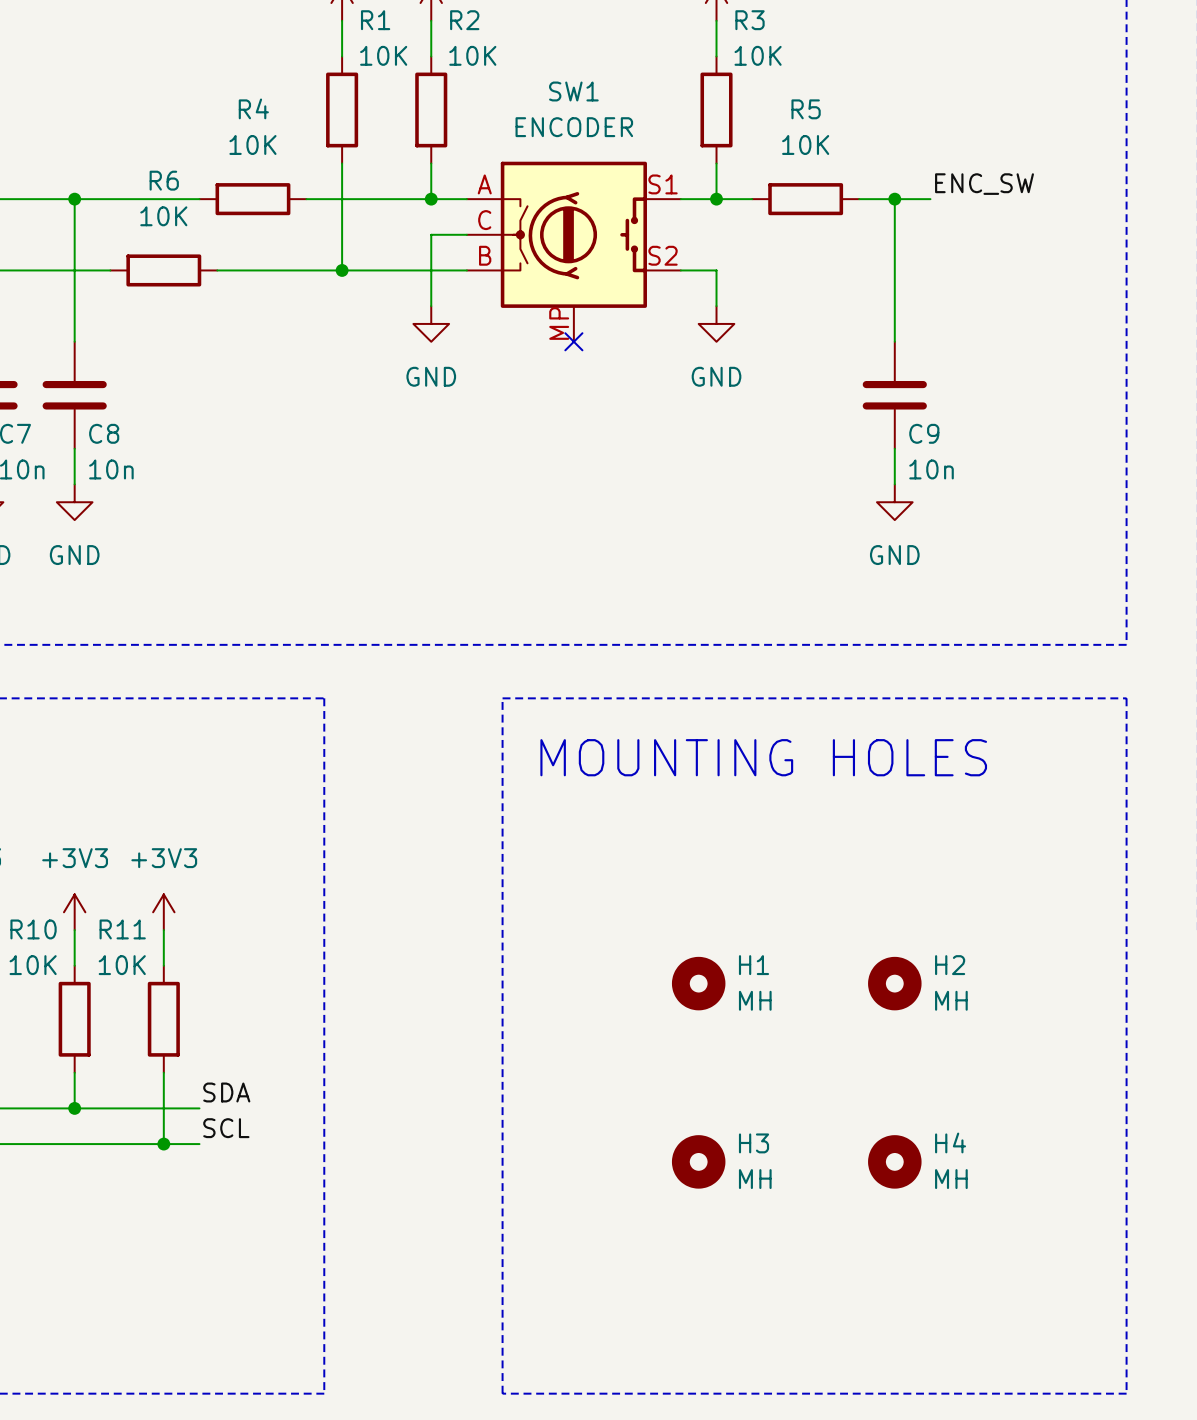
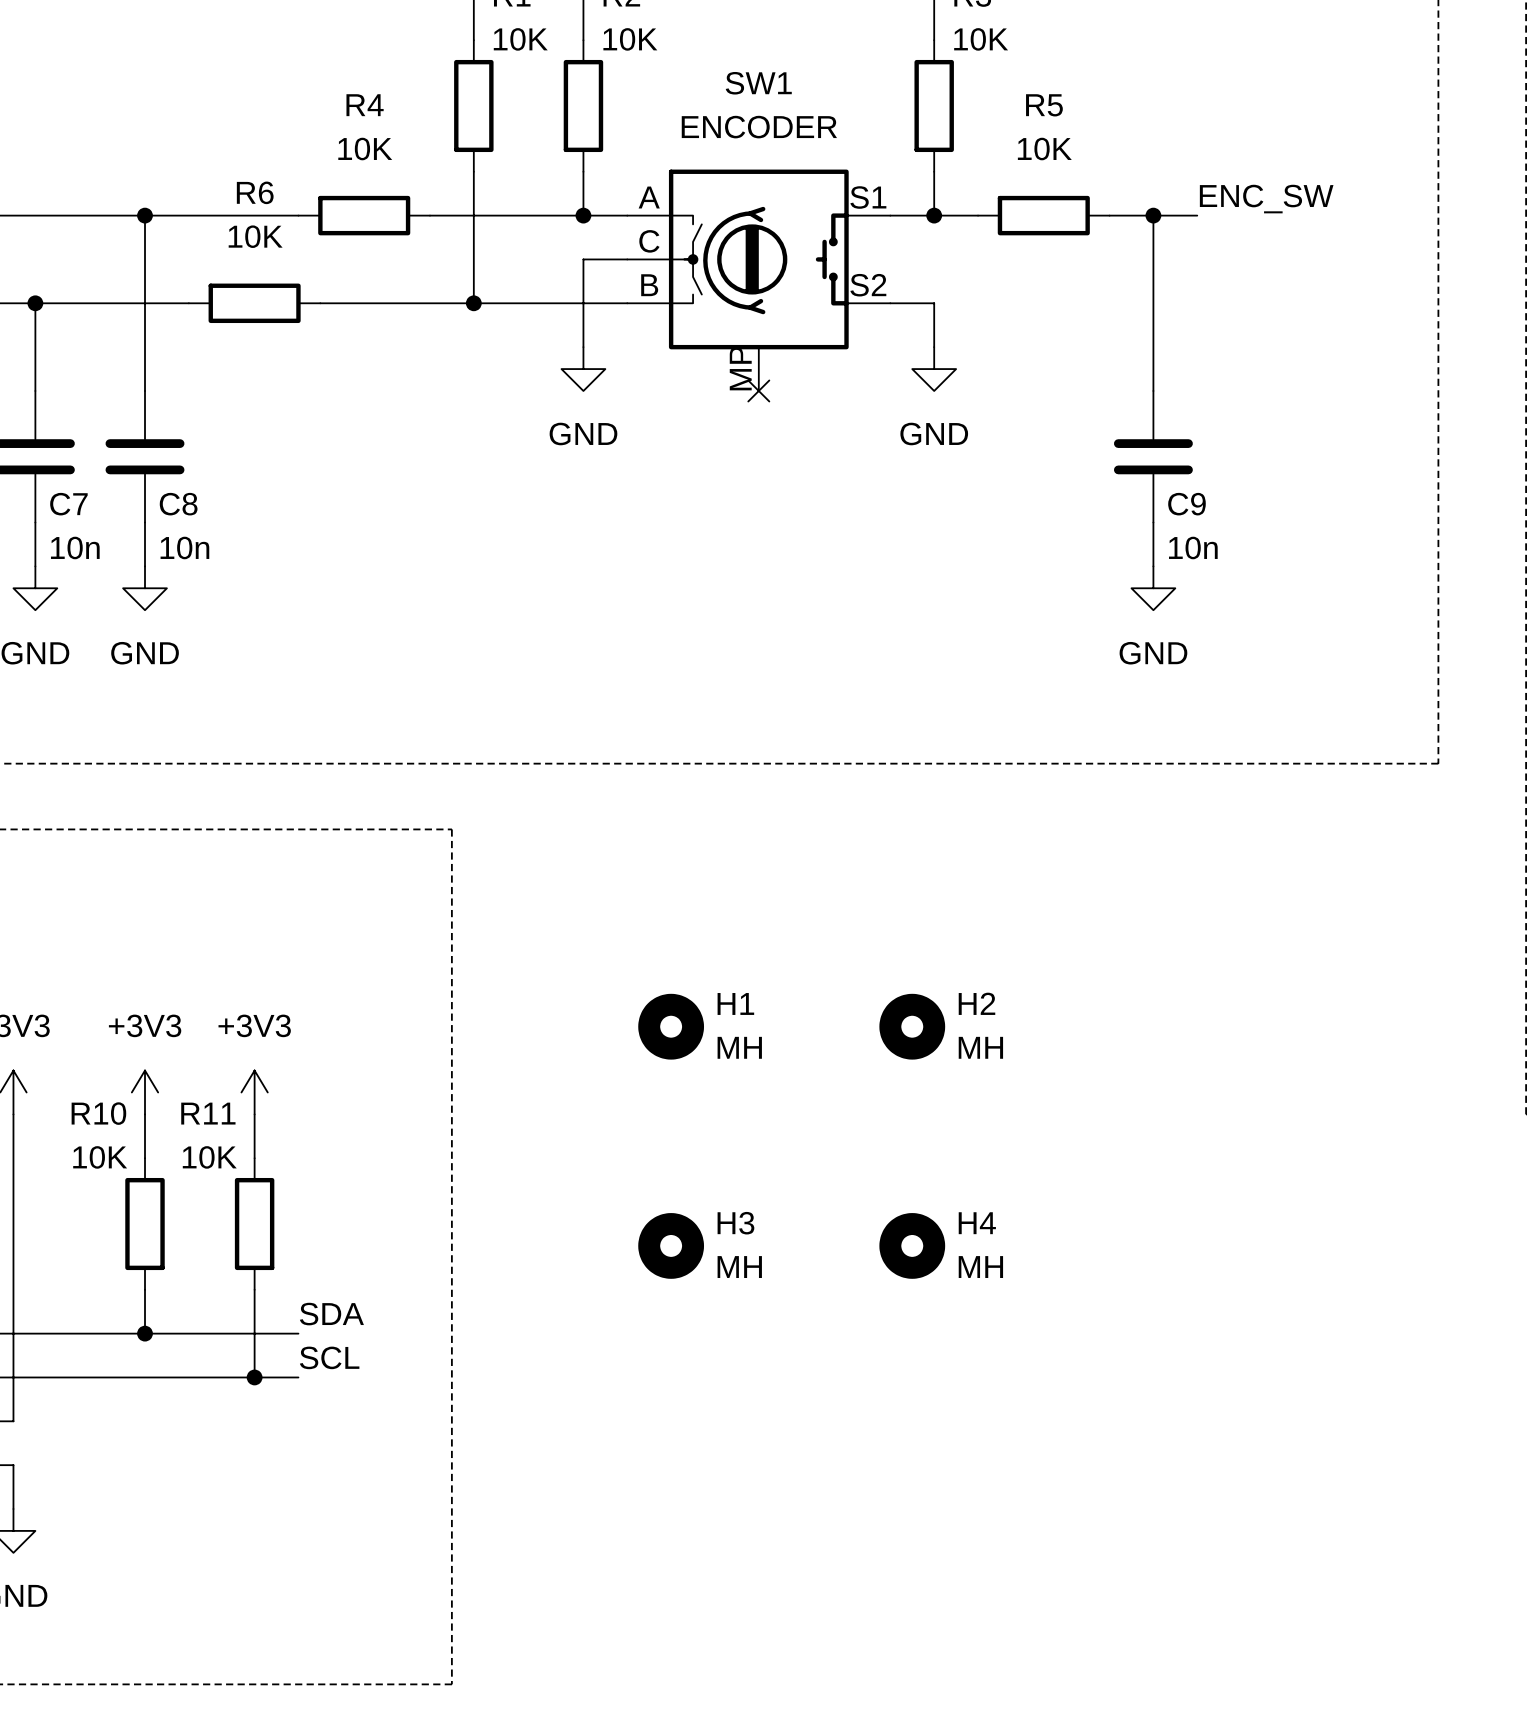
line: (502, 698) (1126, 698) (1126, 1393) (502, 1393) (502, 698) -> none
text: MOUNTING HOLES (763, 757) -> none
H1 position: (698, 983) -> (671, 1026)
H2 position: (894, 983) -> (912, 1026)
H3 position: (698, 1161) -> (671, 1245)
H4 position: (894, 1161) -> (912, 1245)

